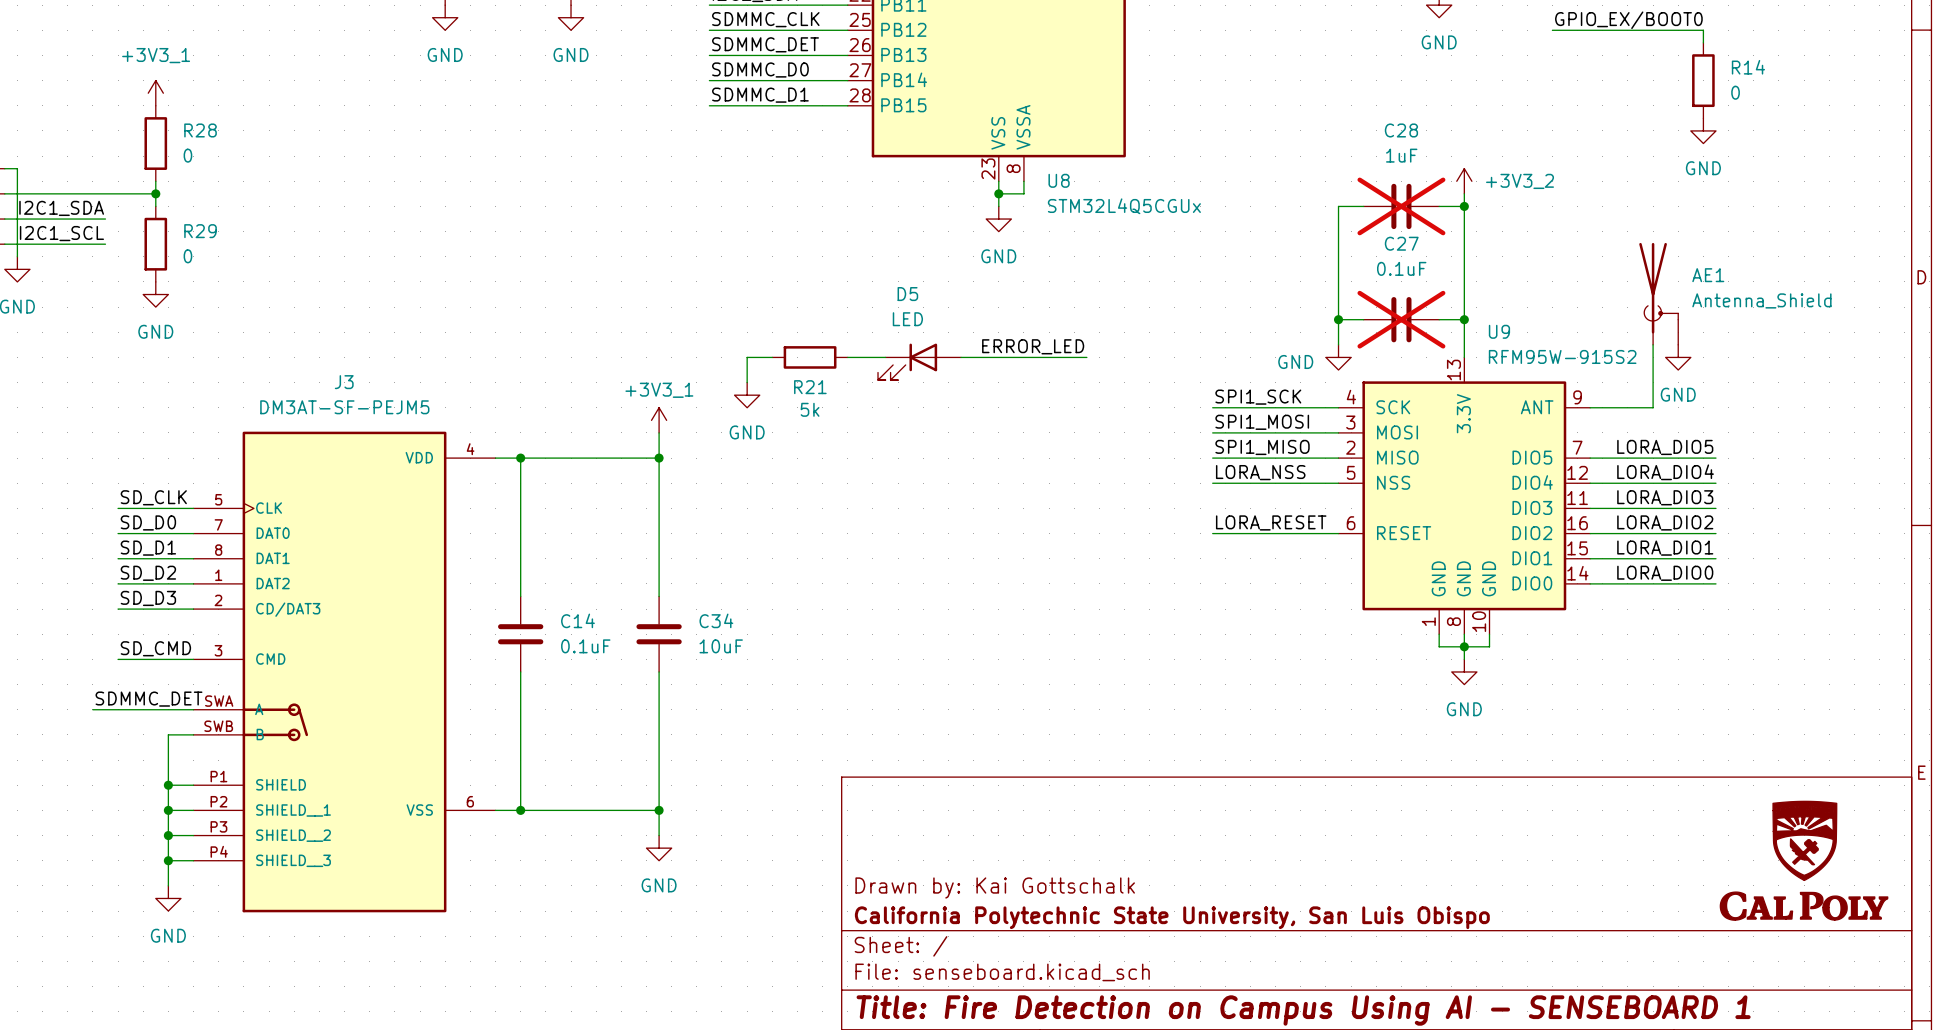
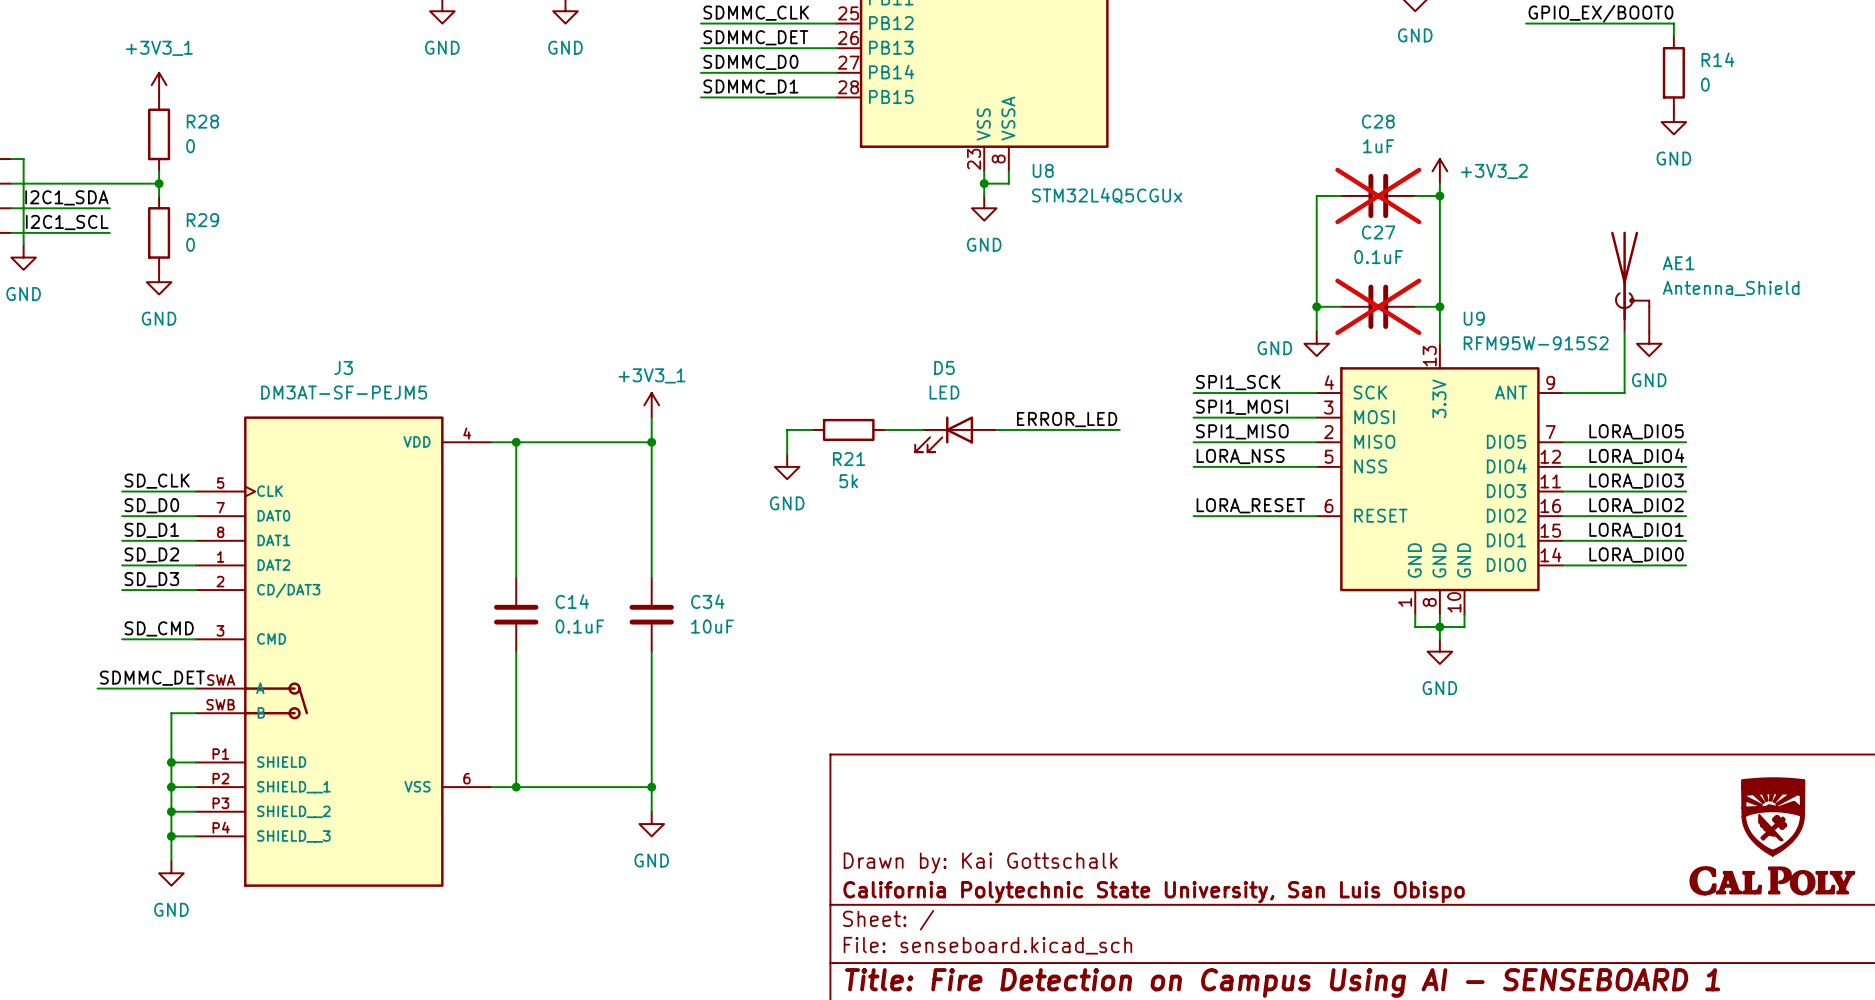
label position: ERROR_LED (1033, 346) -> ERROR_LED (1067, 419)
wire: (772, 357) (747, 357) (747, 382) -> (811, 429) (787, 429) (787, 454)
R21 position: (810, 357) -> (848, 429)
wire: (847, 357) (885, 357) -> (885, 429) (922, 429)
wire: (961, 357) (1086, 357) -> (996, 429) (1119, 429)
D5 position: (919, 361) -> (955, 434)
power symbol position: GND (747, 395) -> GND (787, 466)

